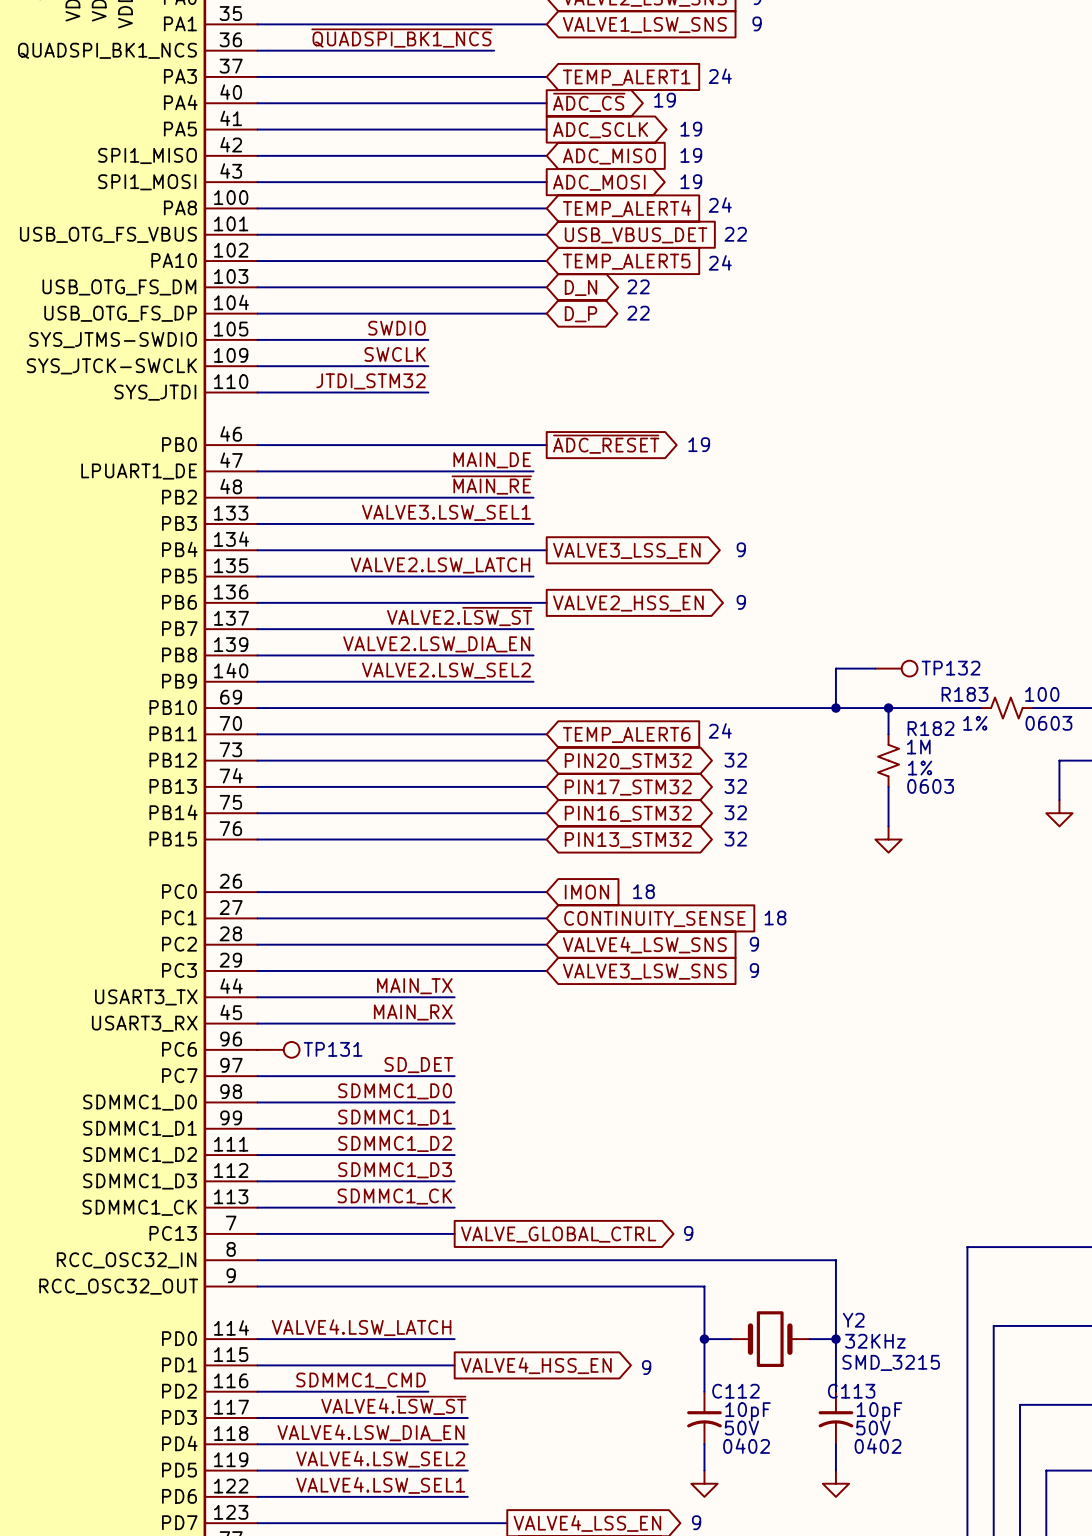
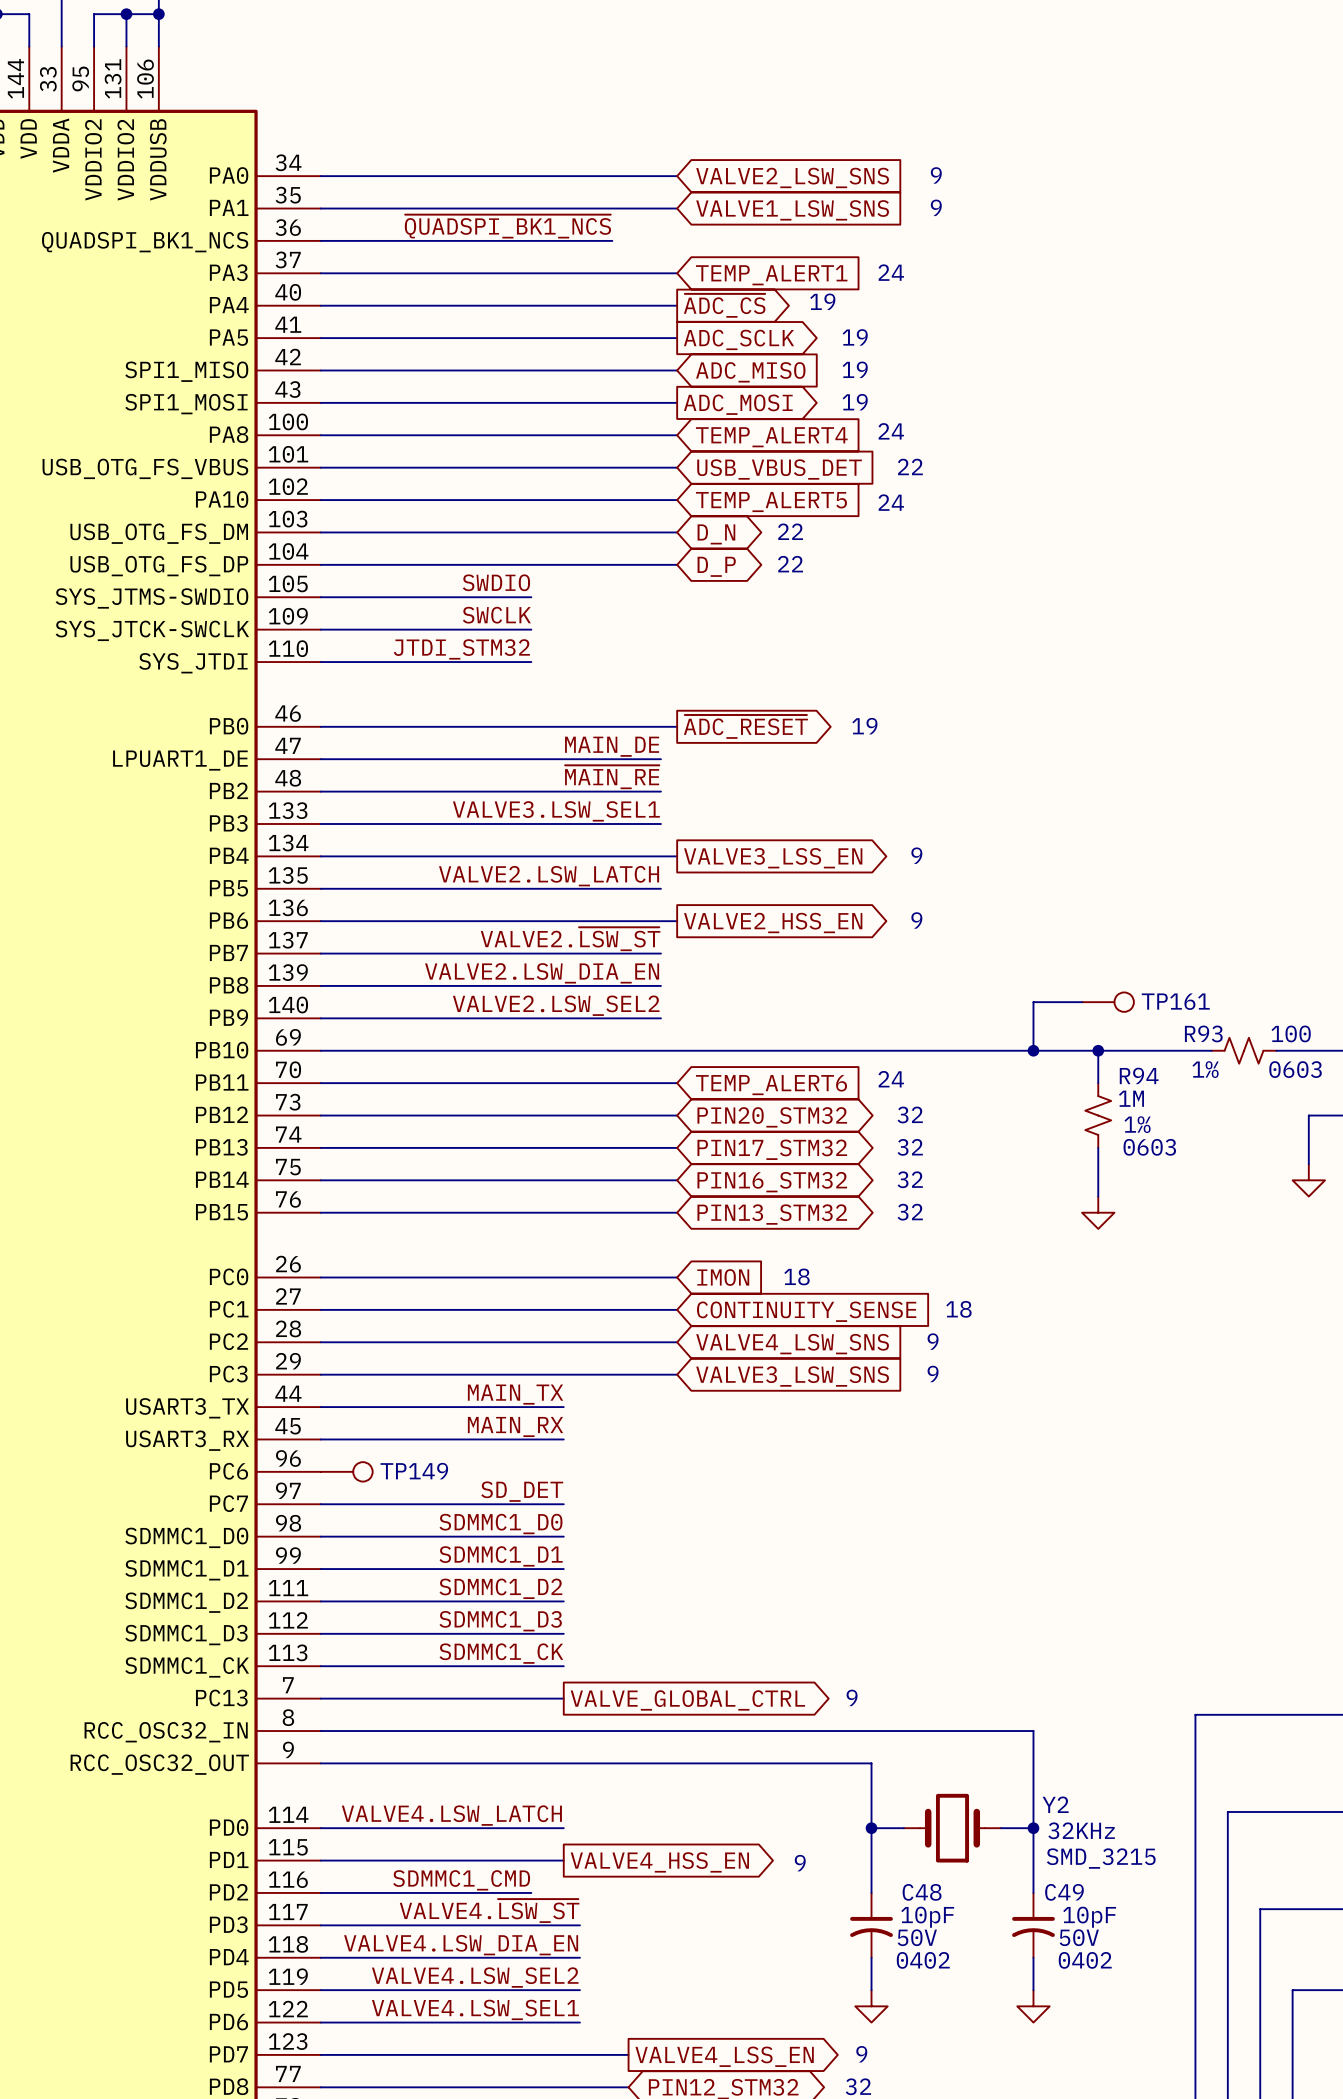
TP132 name: TP132 (951, 668) -> TP161 (1175, 1001)
R183 name: R183 (965, 694) -> R93 (1203, 1033)
R182 name: R182 (931, 728) -> R94 (1139, 1075)
TP131 name: TP131 (333, 1049) -> TP149 (414, 1471)
C112 name: C112 (735, 1391) -> C48 (922, 1892)
C113 name: C113 (851, 1391) -> C49 (1064, 1892)

